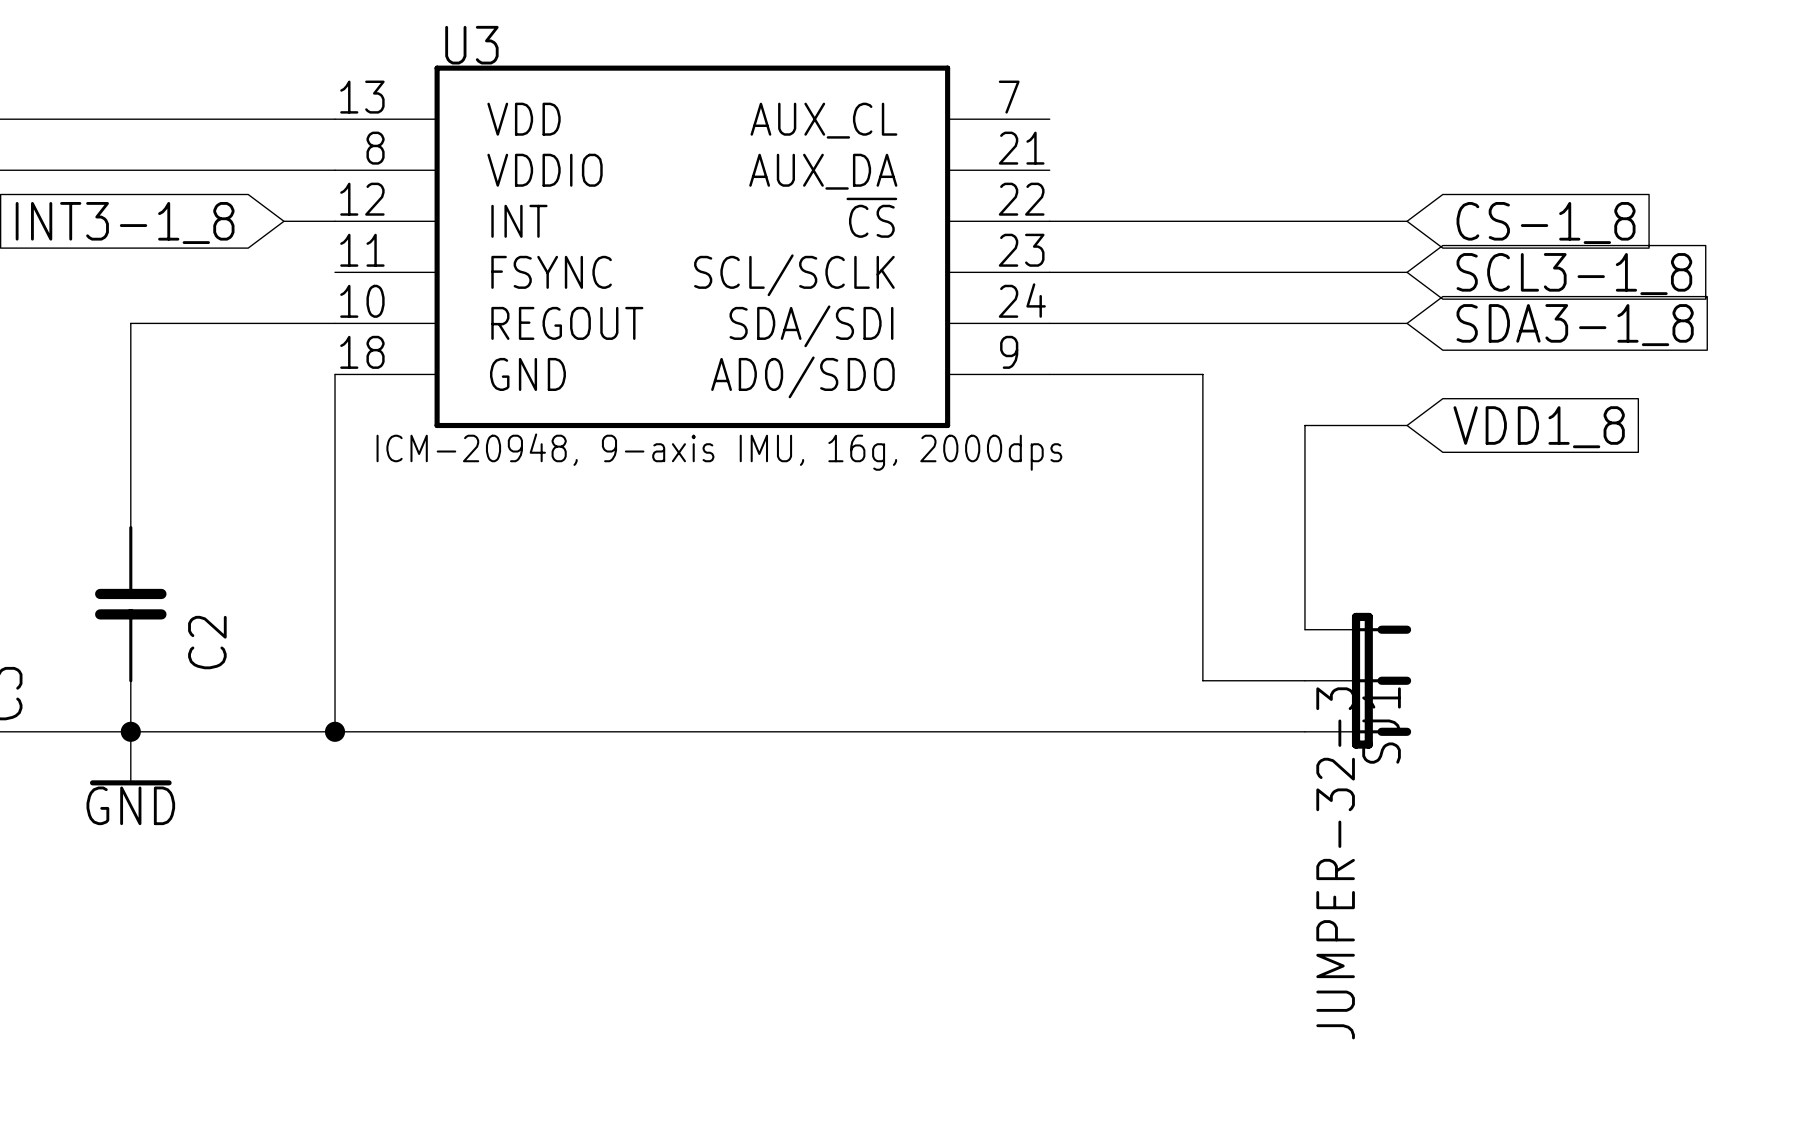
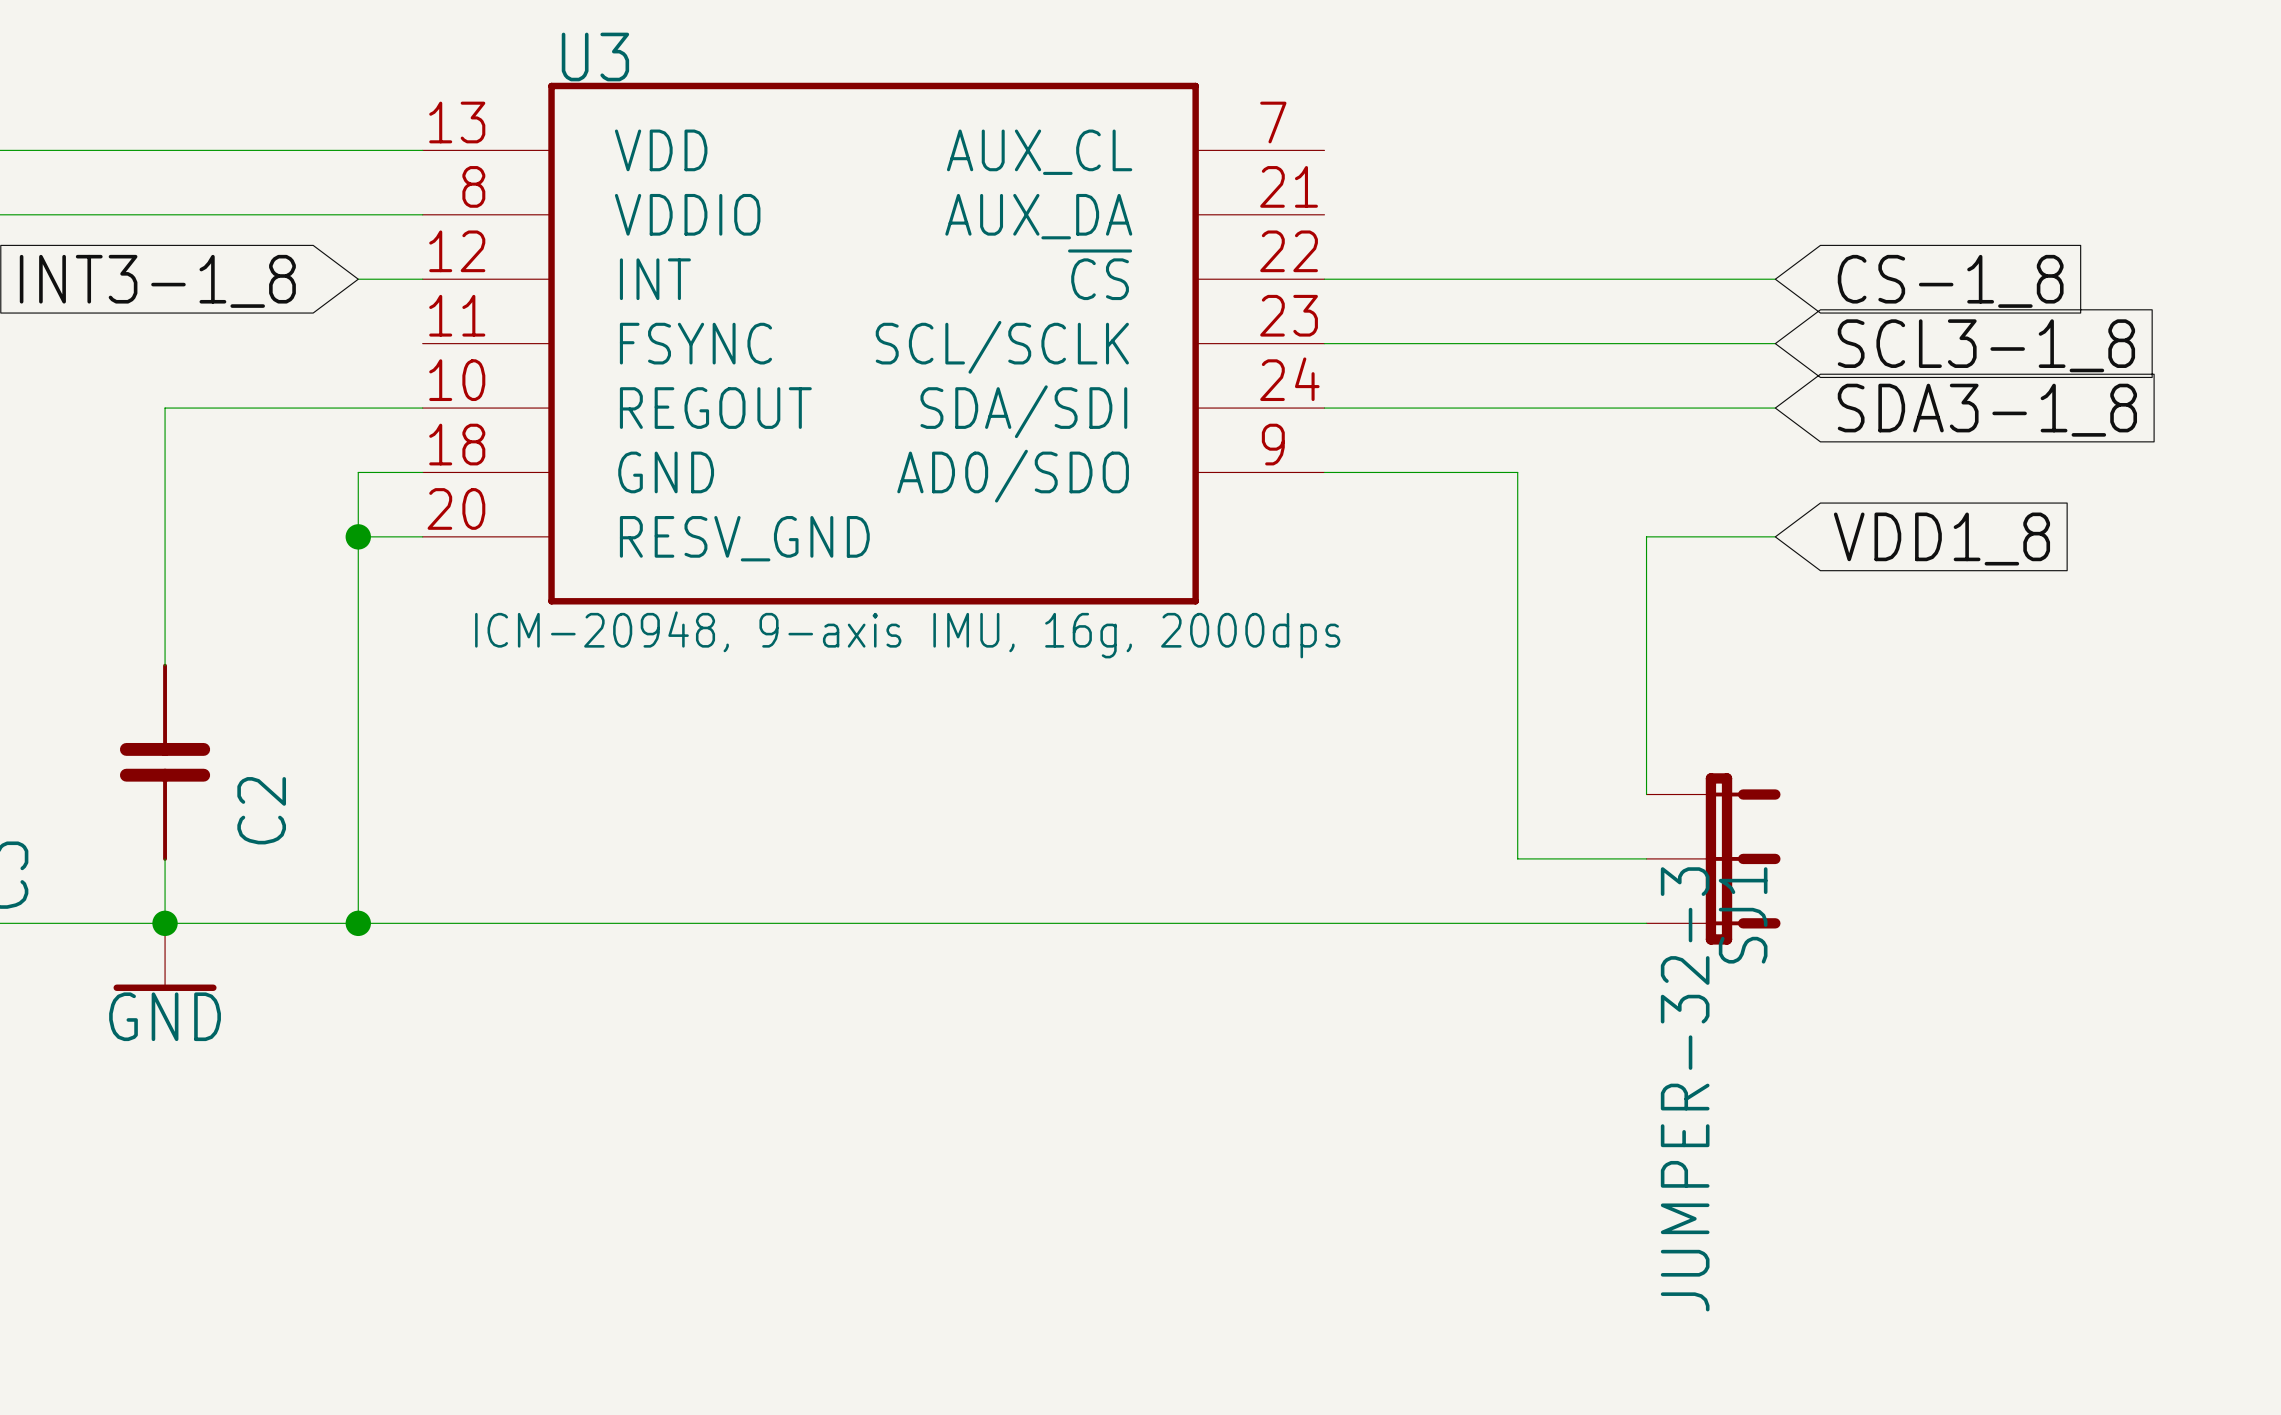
U3 symbol: [335, 65, 1050, 429] -> [422, 82, 1325, 605]
wire: (335, 374) (335, 731) -> (422, 472) (358, 472) (358, 923)
wire: none -> (358, 536) (422, 536)
junction: none -> (358, 536)
junction position: (335, 731) -> (358, 923)

